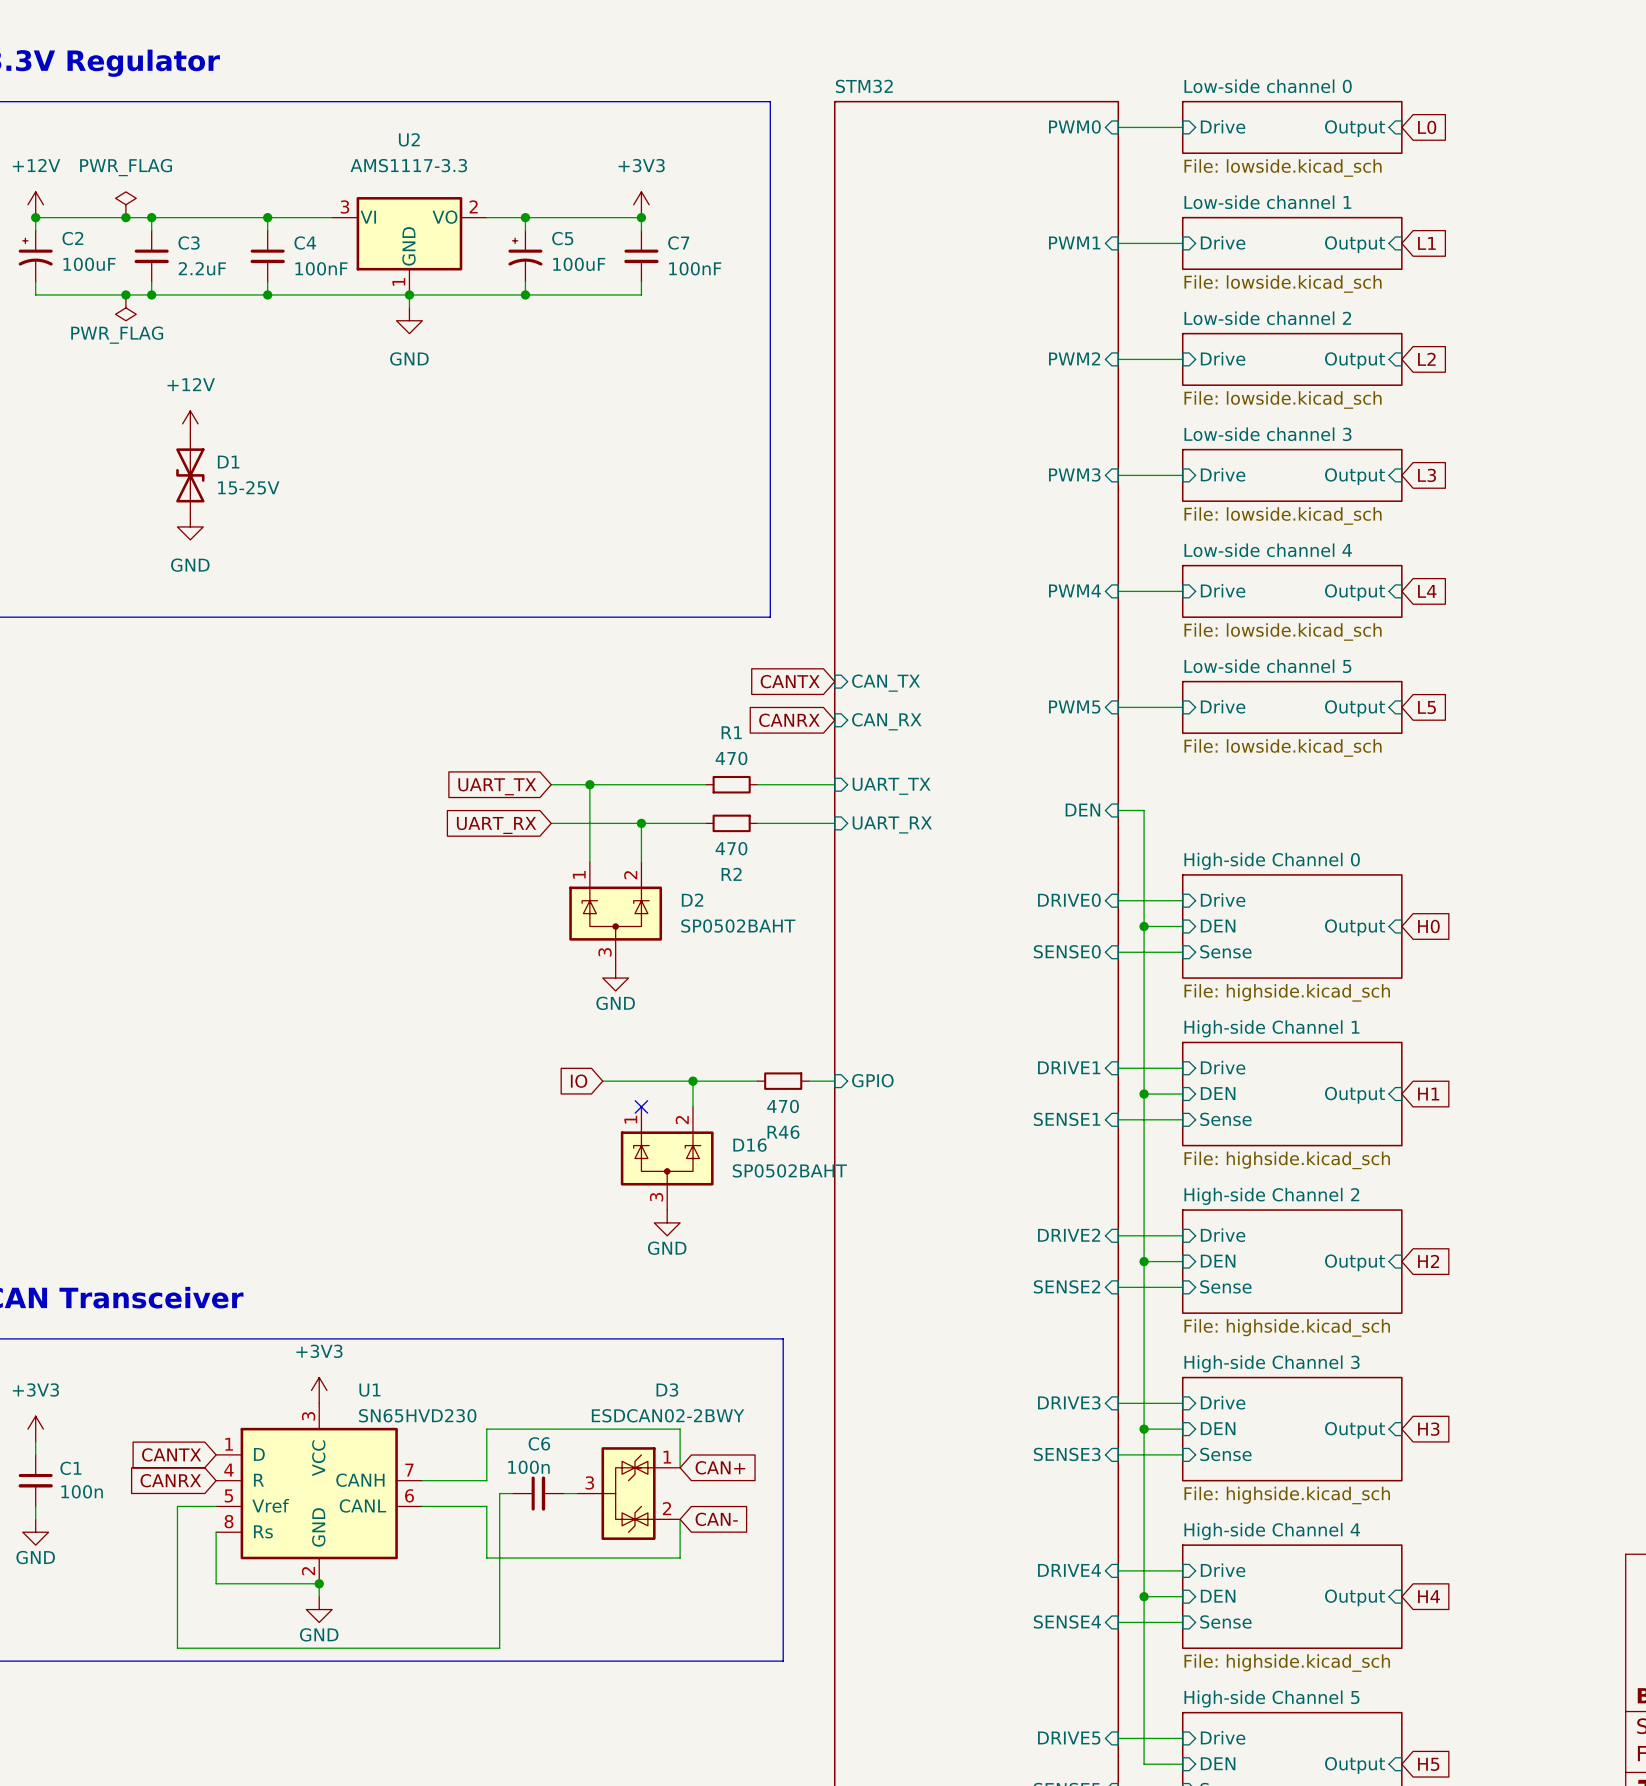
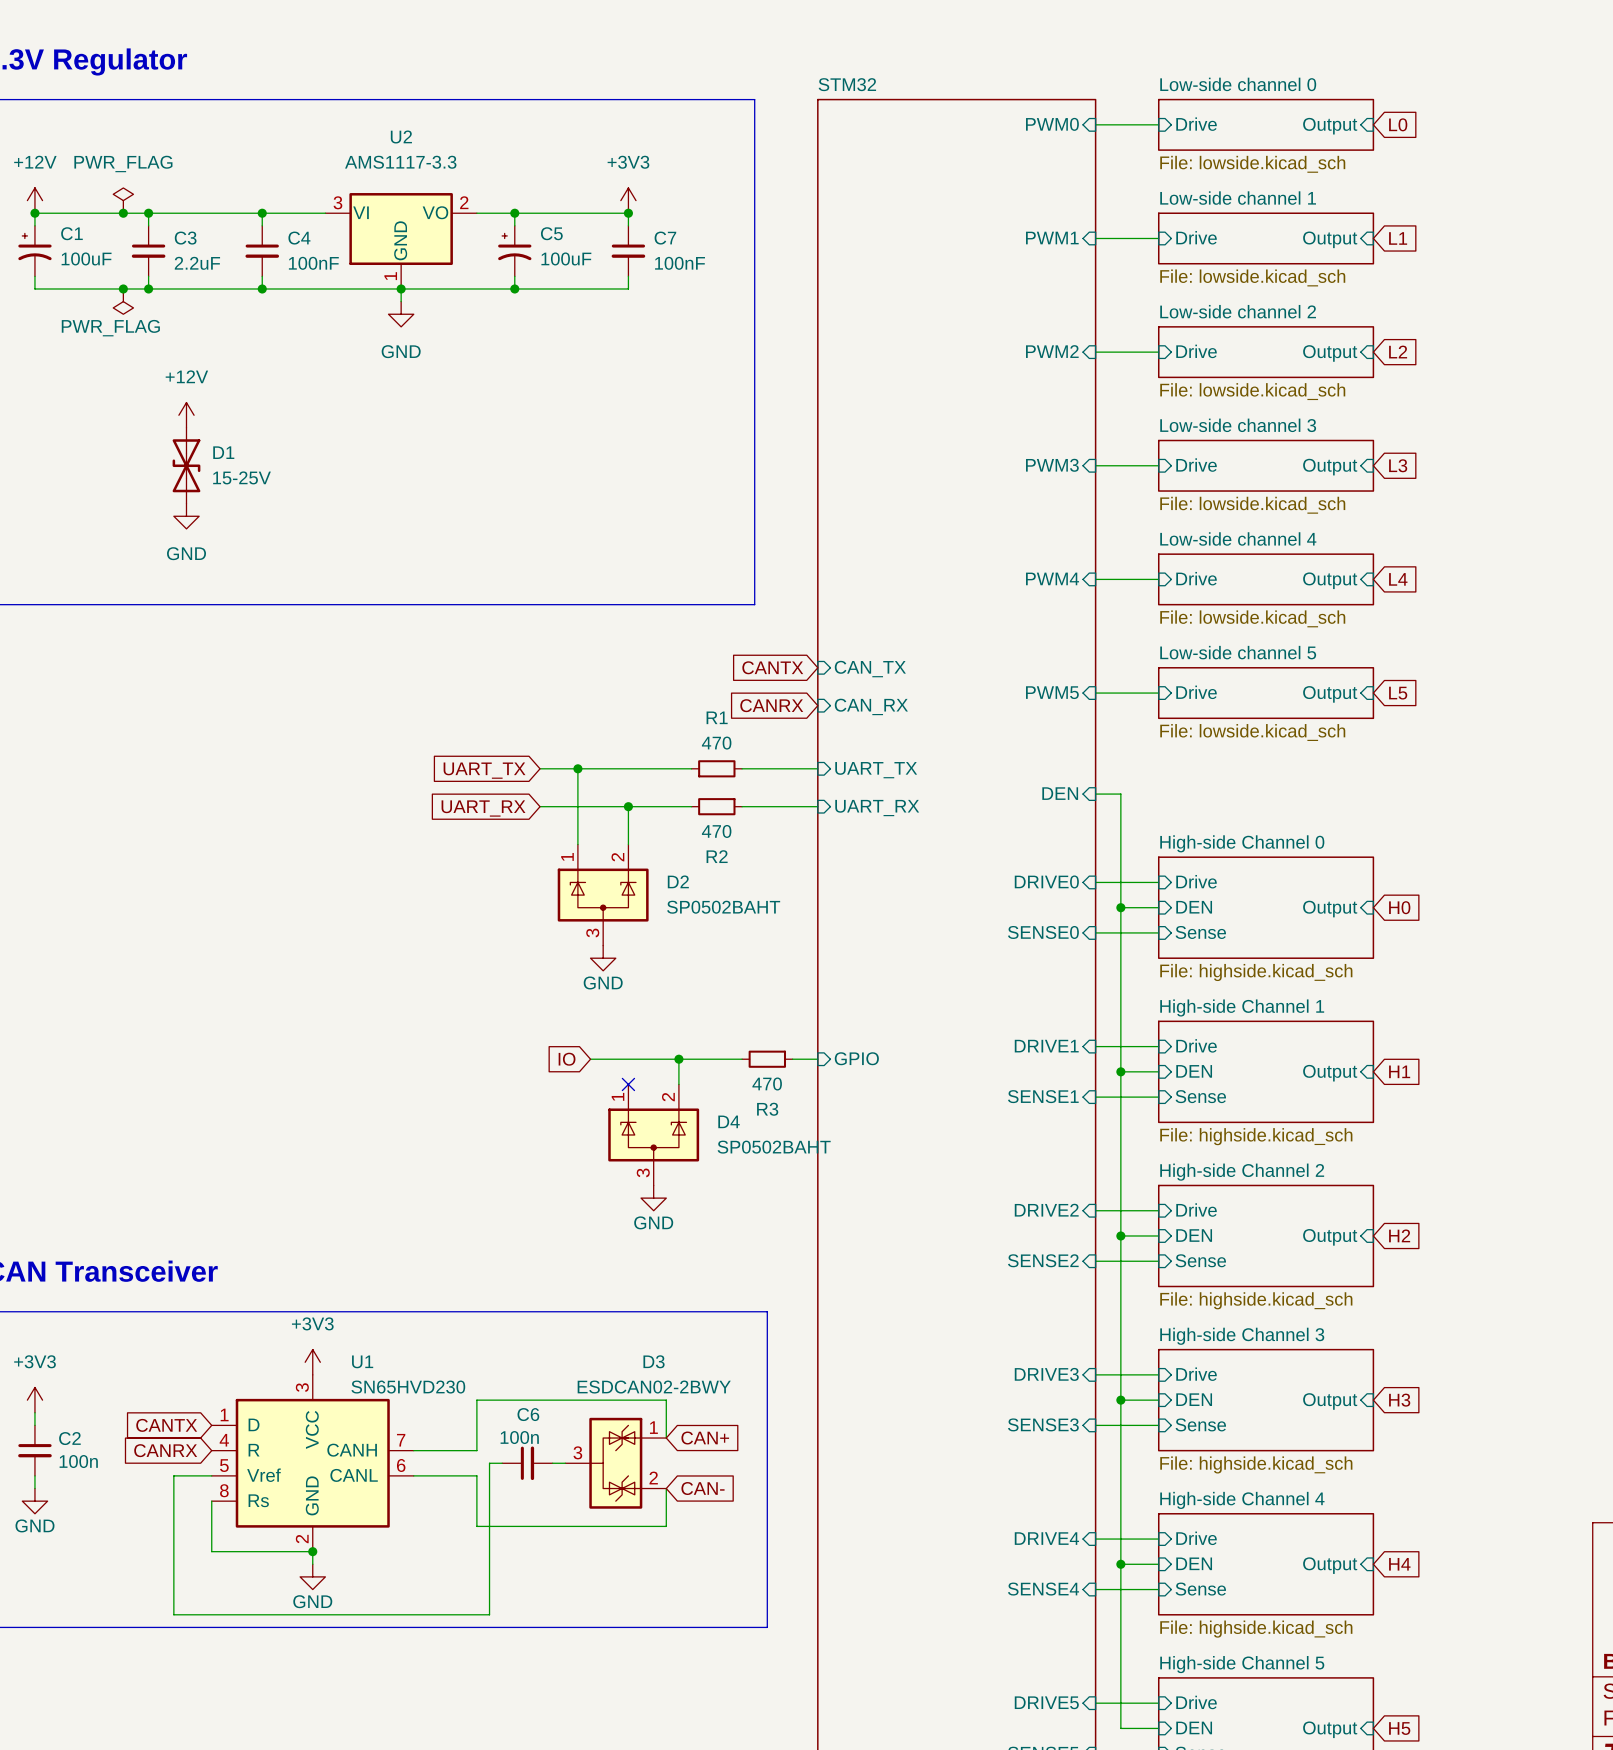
C2 name: C2 (72, 238) -> C1 (71, 233)
R46 name: R46 (783, 1132) -> R3 (767, 1109)
D16 name: D16 (750, 1145) -> D4 (729, 1121)
C1 name: C1 (70, 1468) -> C2 (69, 1438)

